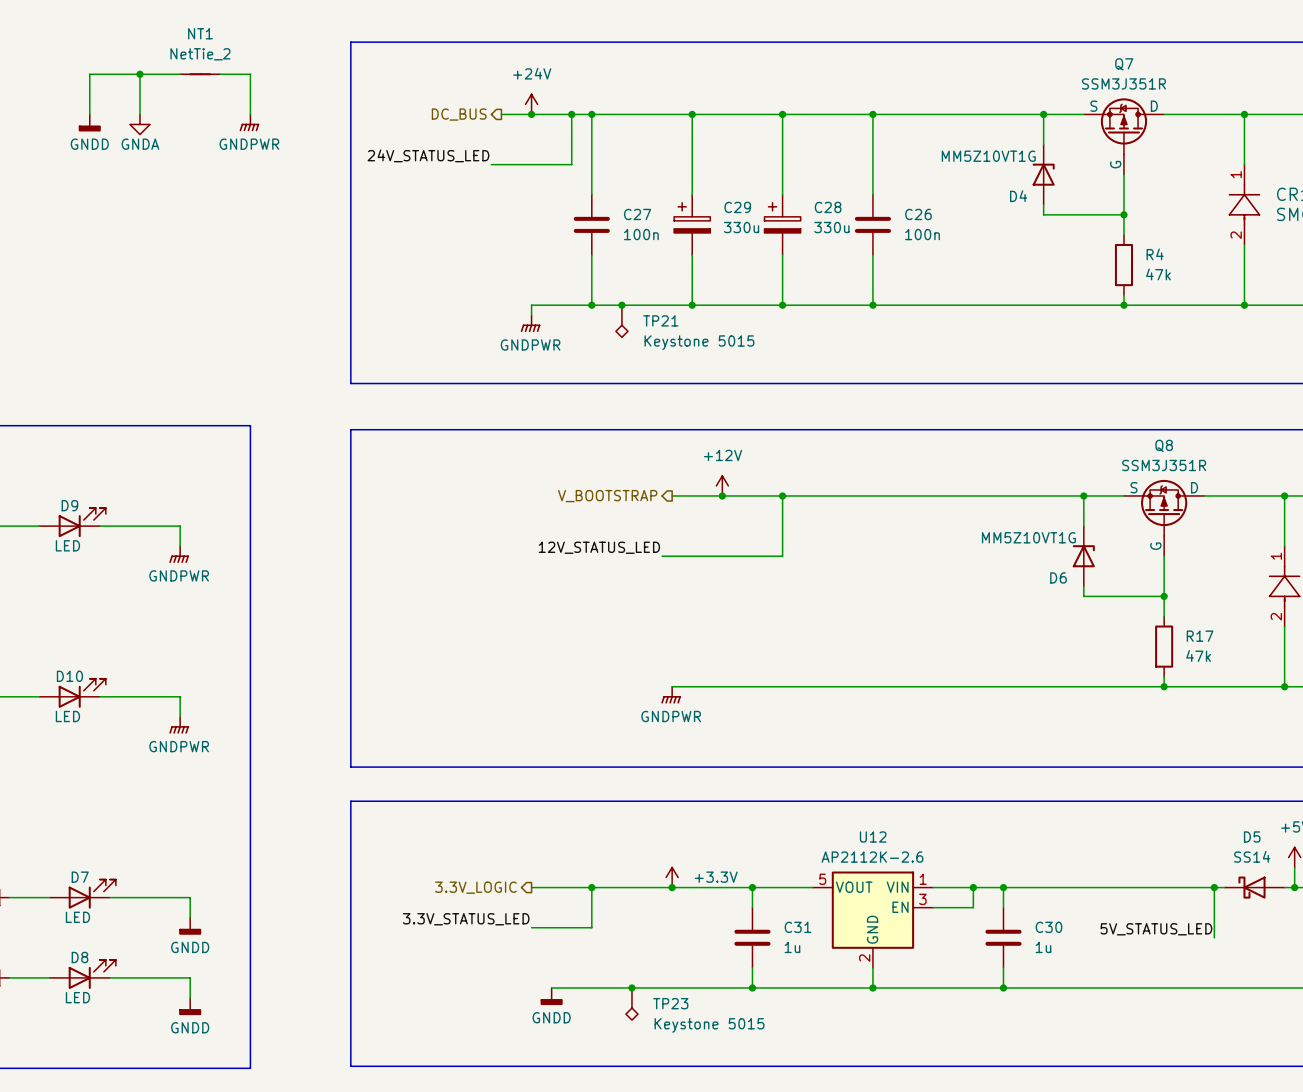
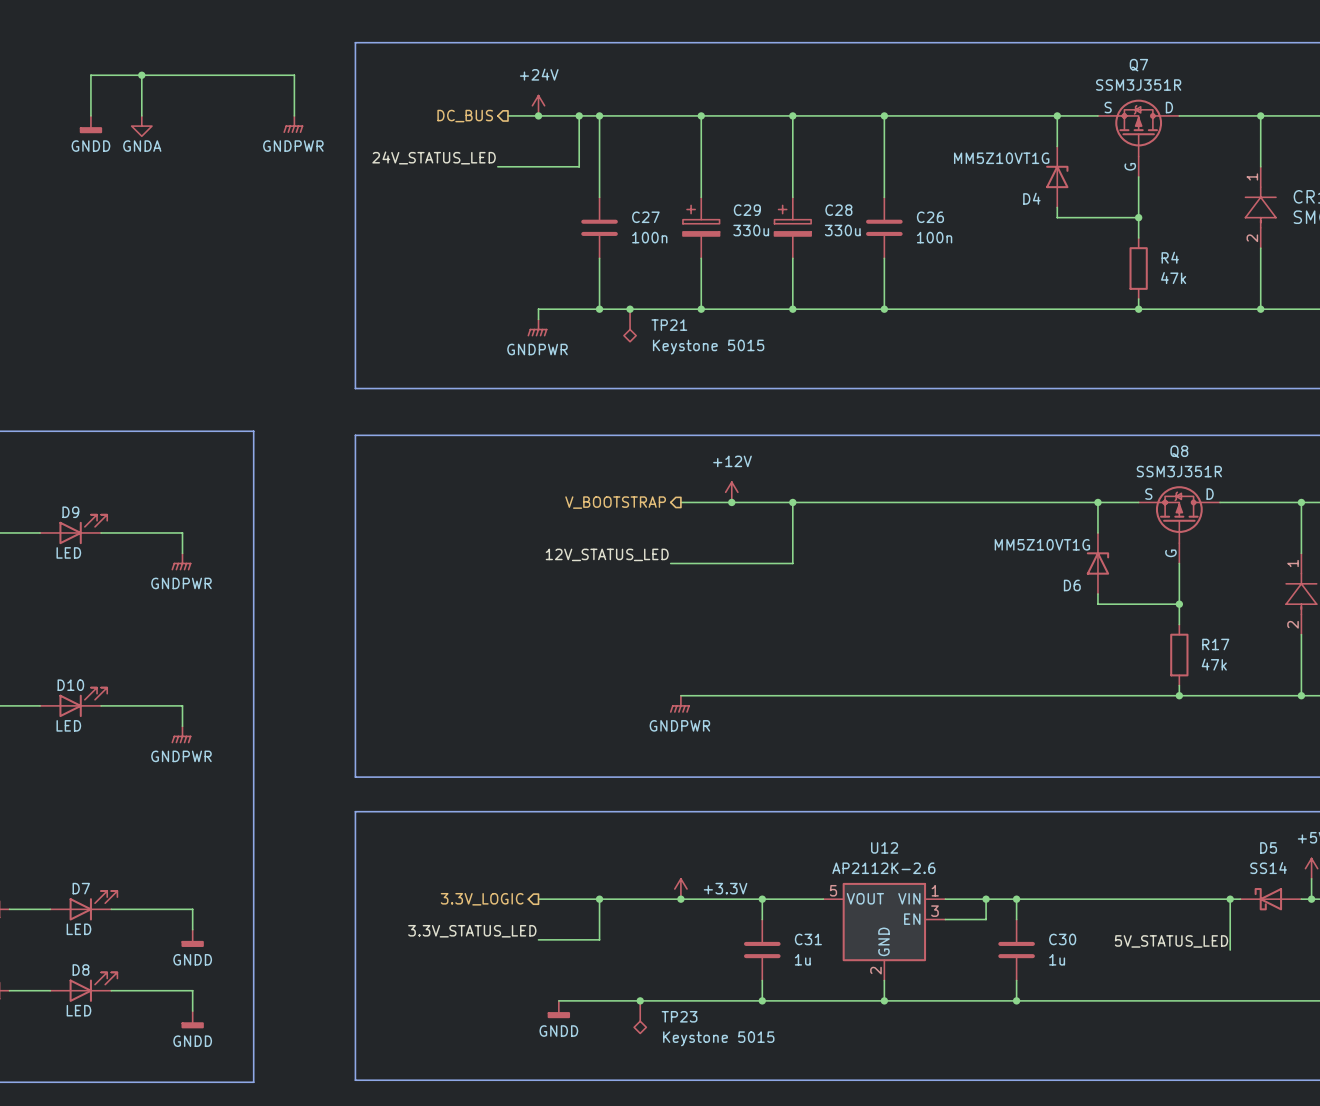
NT1: NetTie_2 (200, 74) -> none
wire: (250, 74) (250, 114) -> (253, 75) (294, 75) (294, 115)
power symbol position: GNDPWR (249, 122) -> GNDPWR (293, 124)

